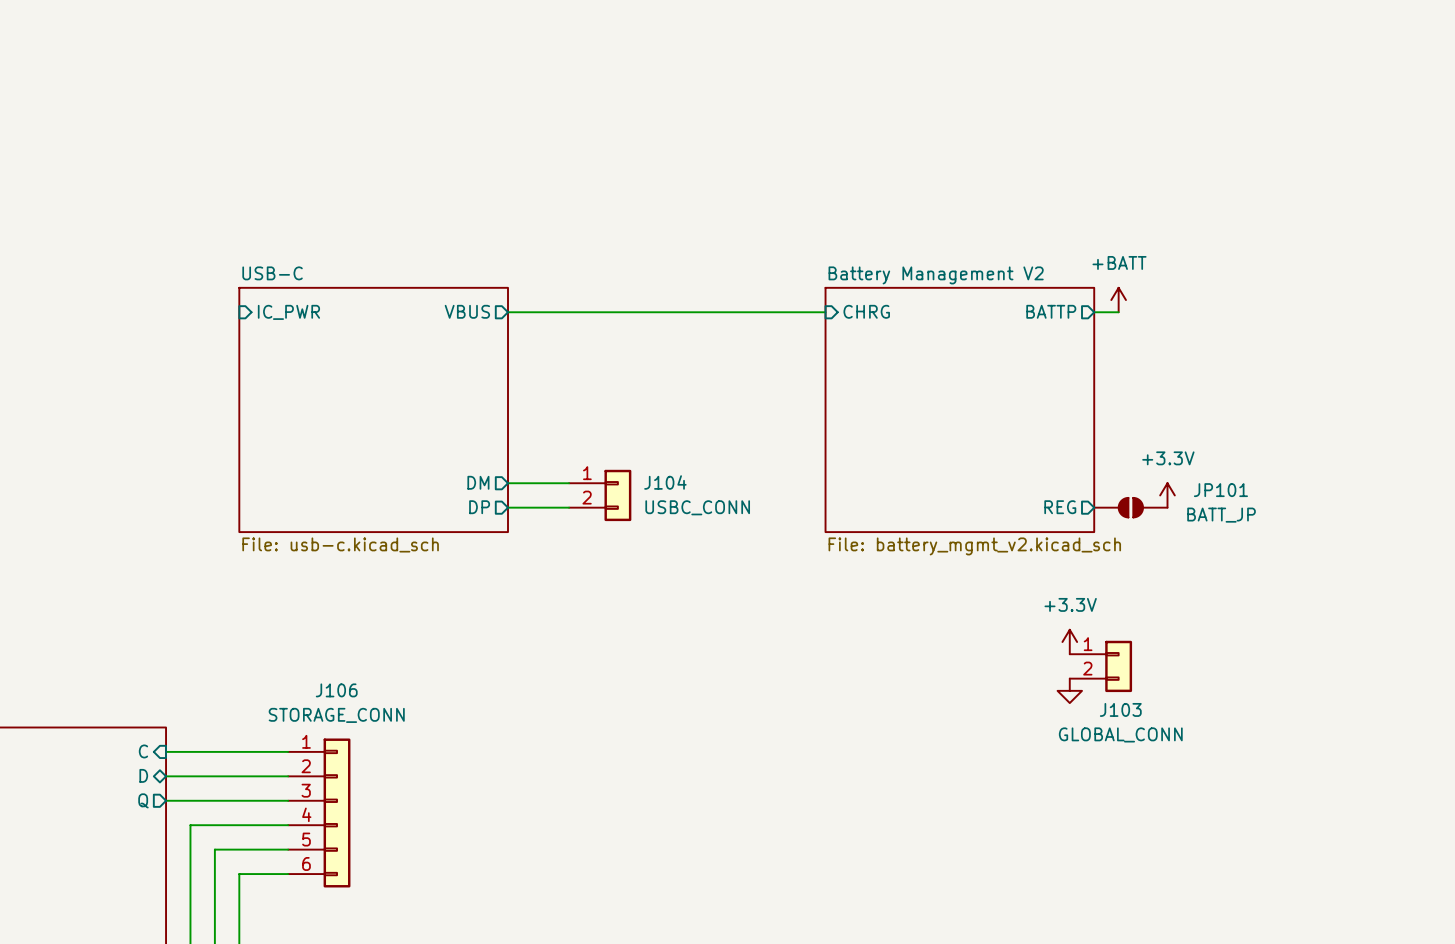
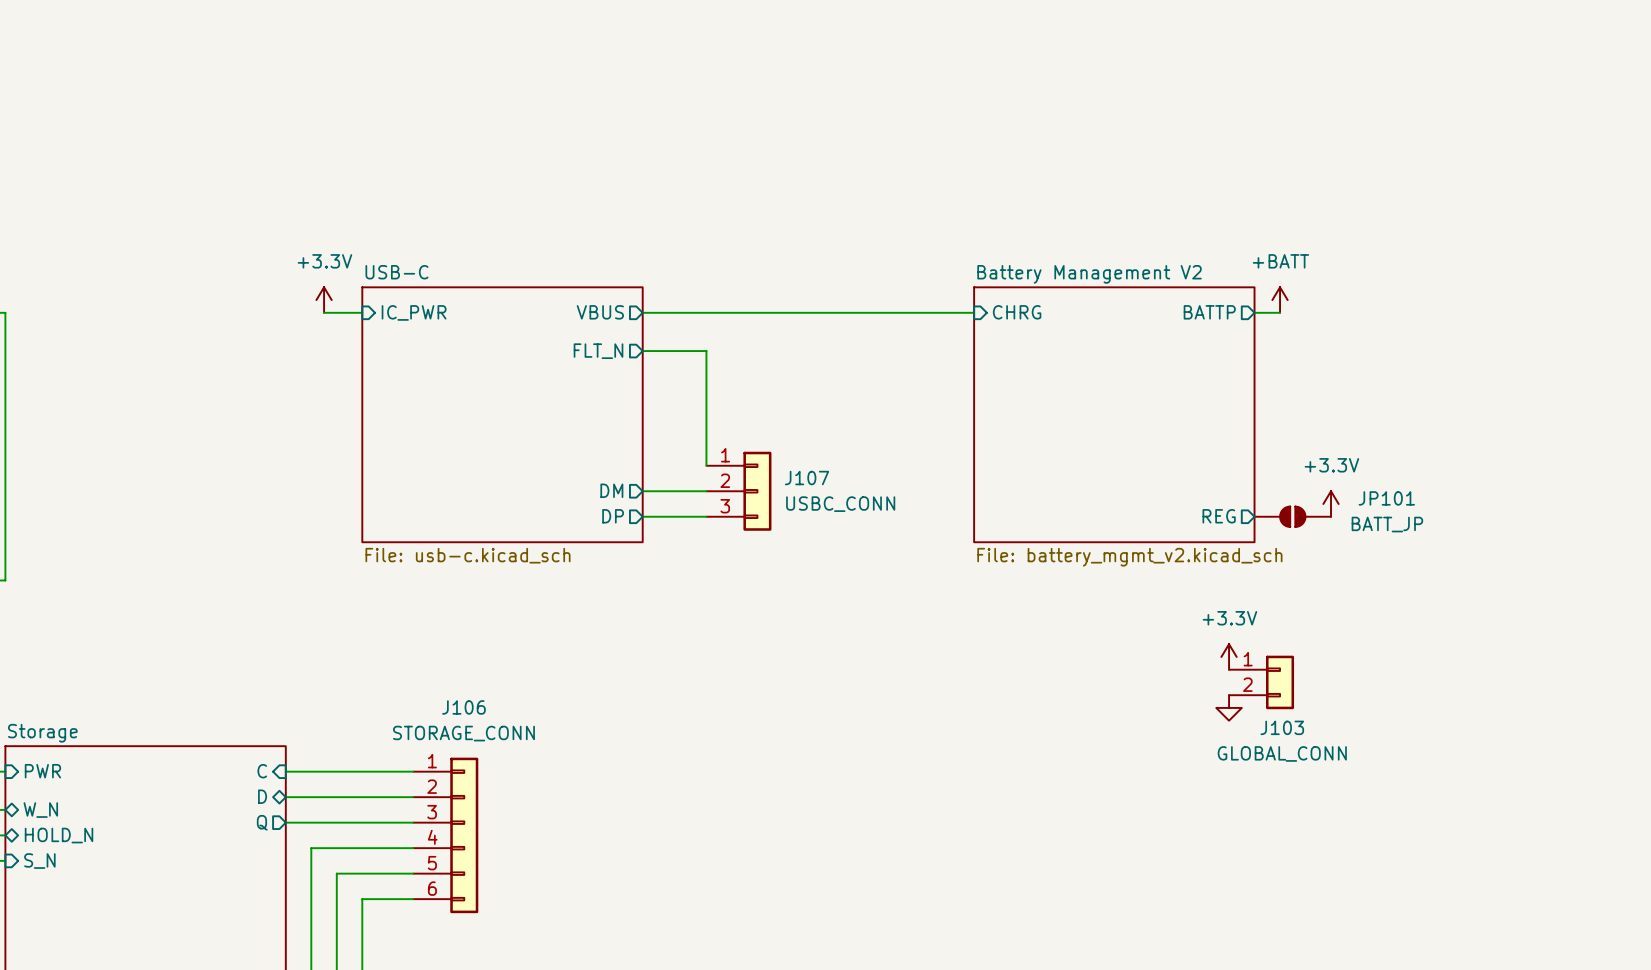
power symbol: none -> +3.3V (324, 300)
wire: none -> (324, 312) (362, 312)
wire: none -> (642, 351) (706, 351) (706, 465)
sheet pin: none -> FLT_N (598, 351)
J107: none -> USBC_CONN (738, 491)
J104: USBC_CONN (600, 495) -> none

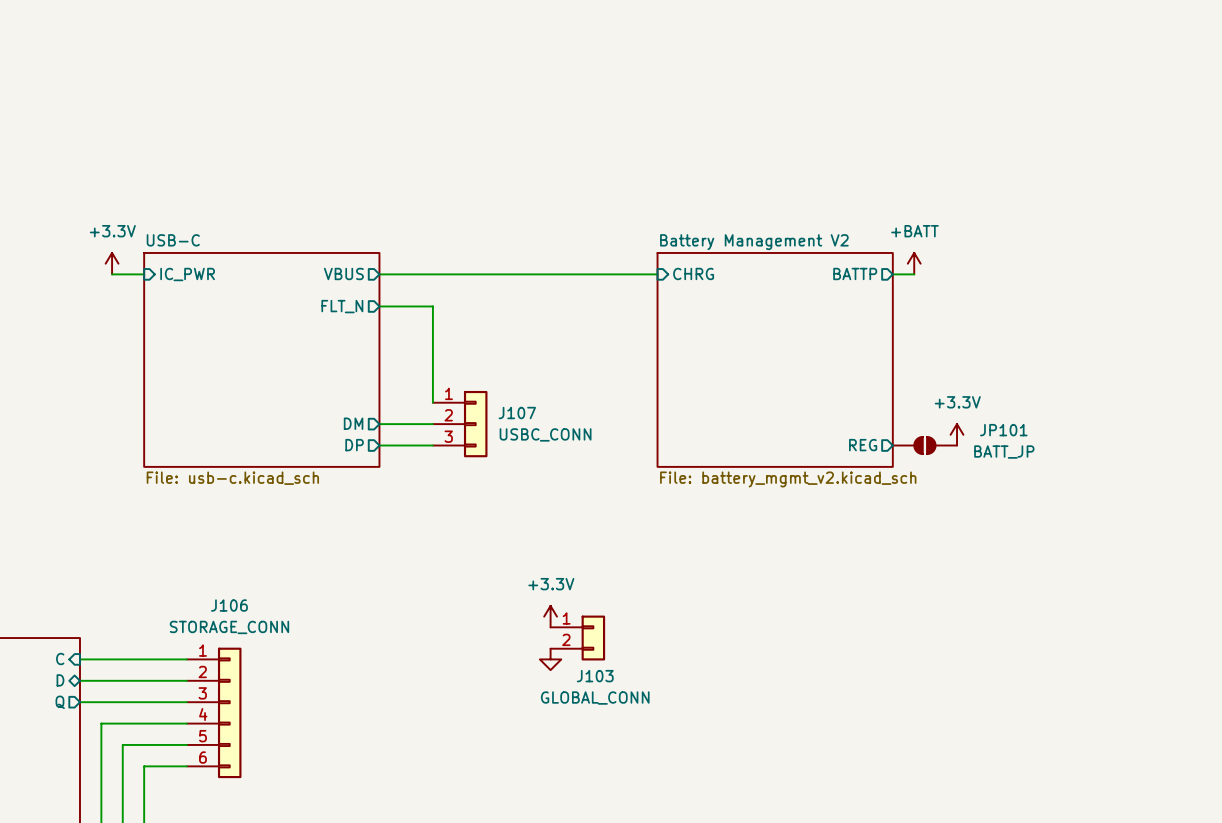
power symbol: +3.3V (1229, 656) -> none
J103 position: (1261, 682) -> (577, 638)
power symbol: (1229, 707) -> none
power symbol: none -> +3.3V (550, 616)
power symbol: none -> (550, 659)

